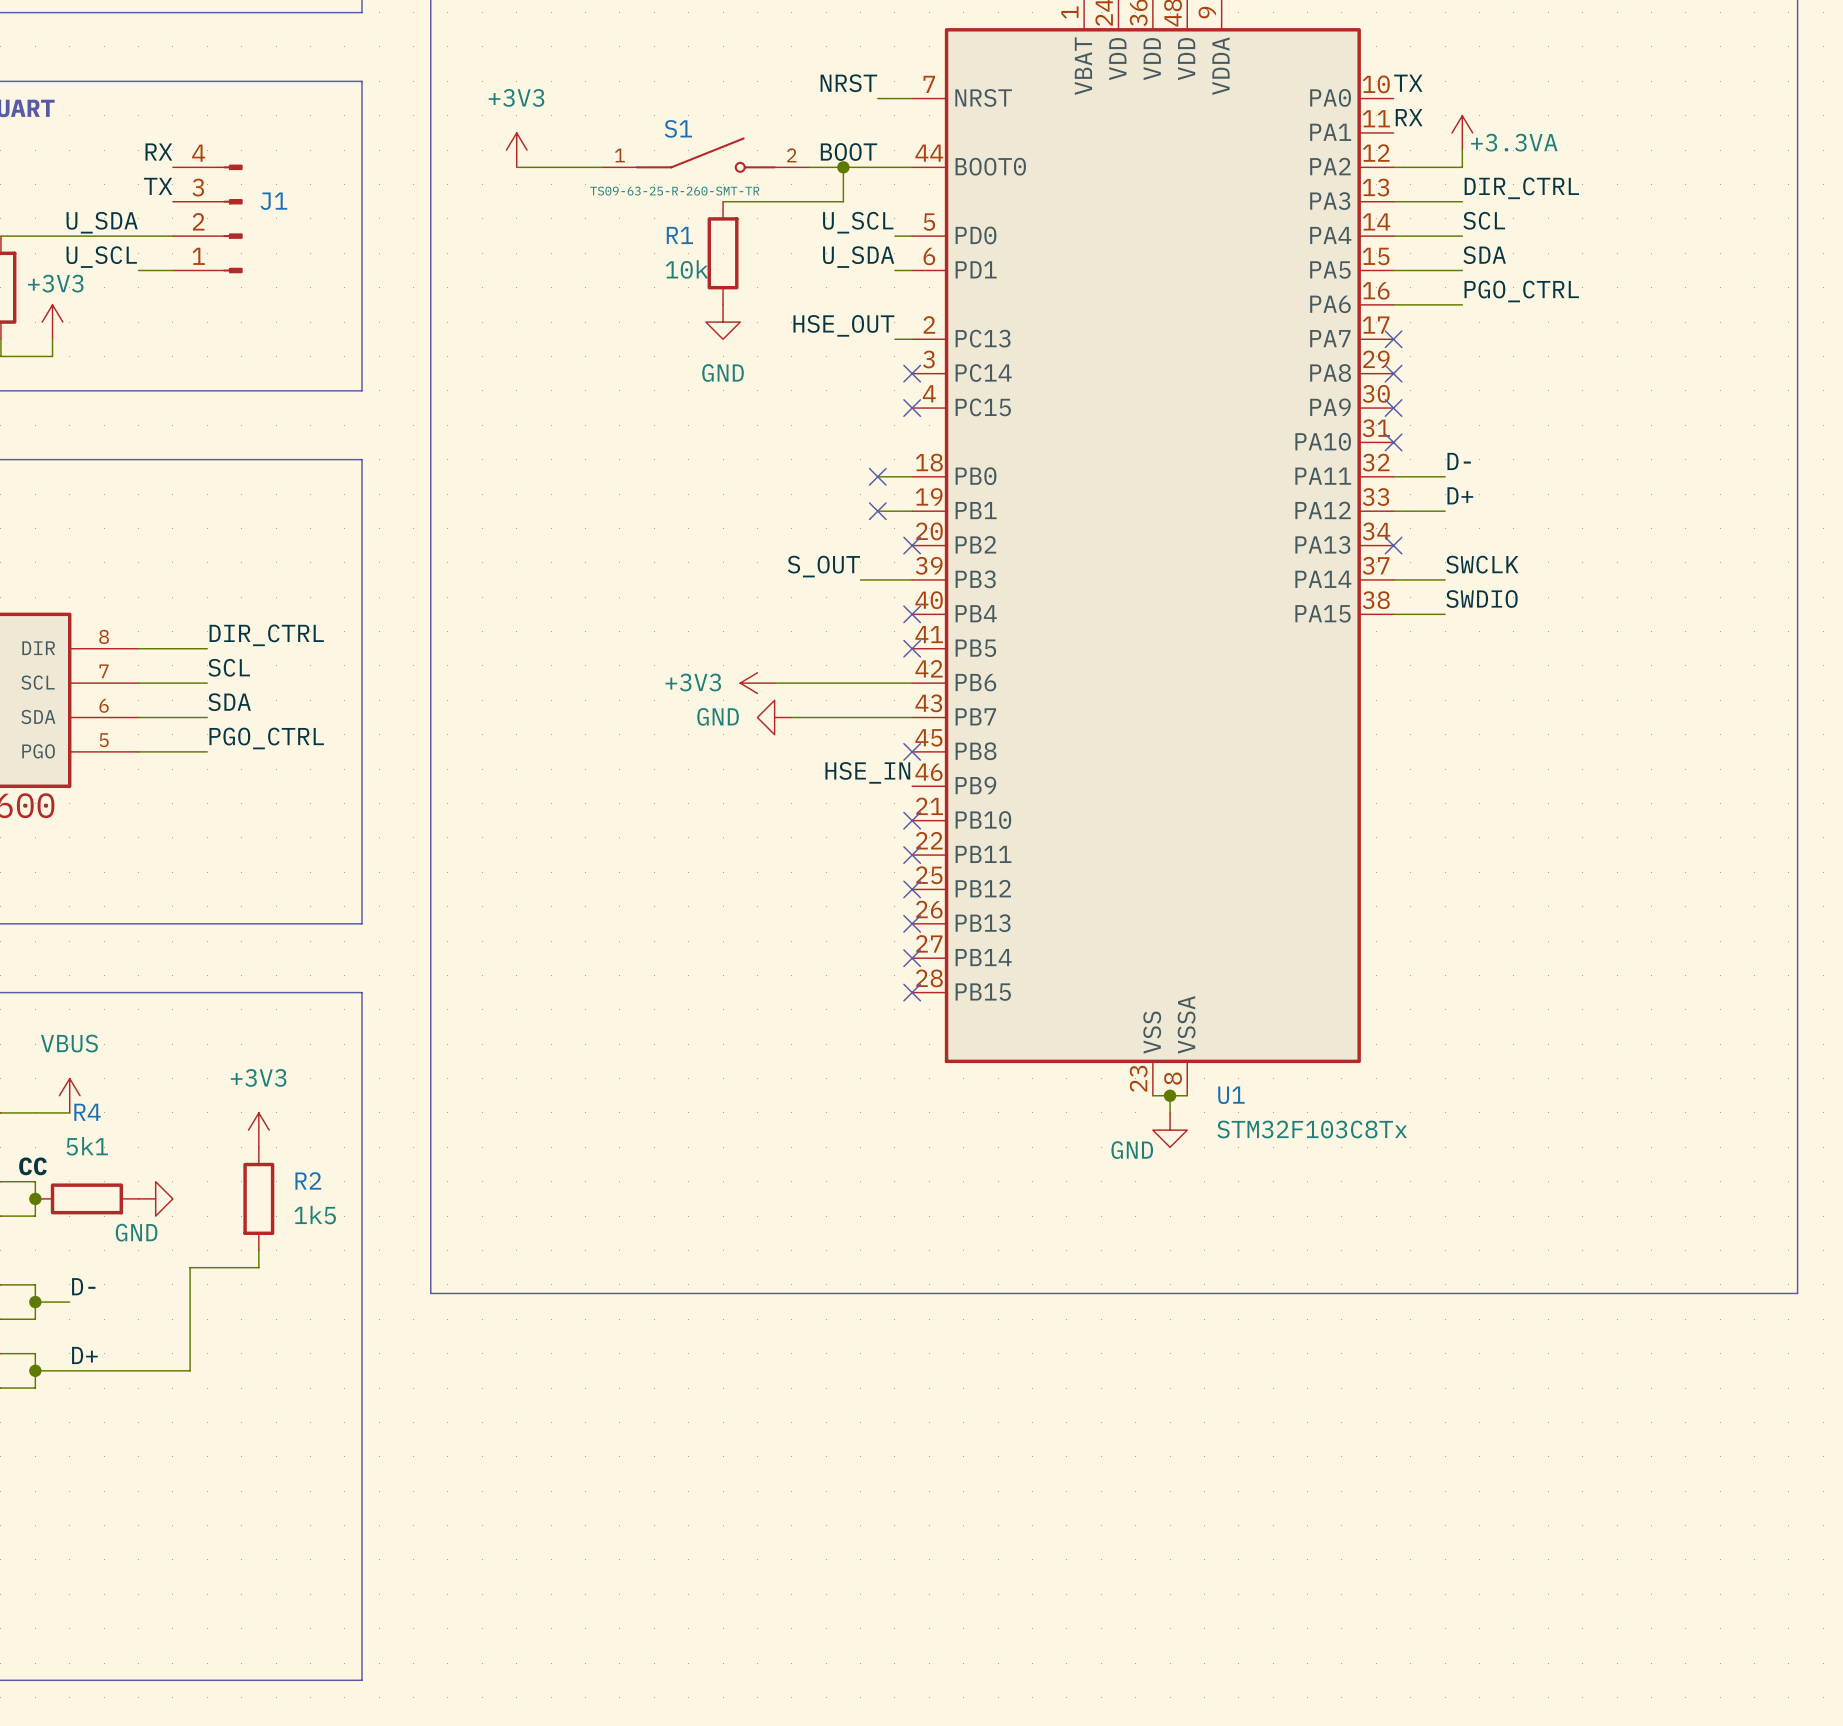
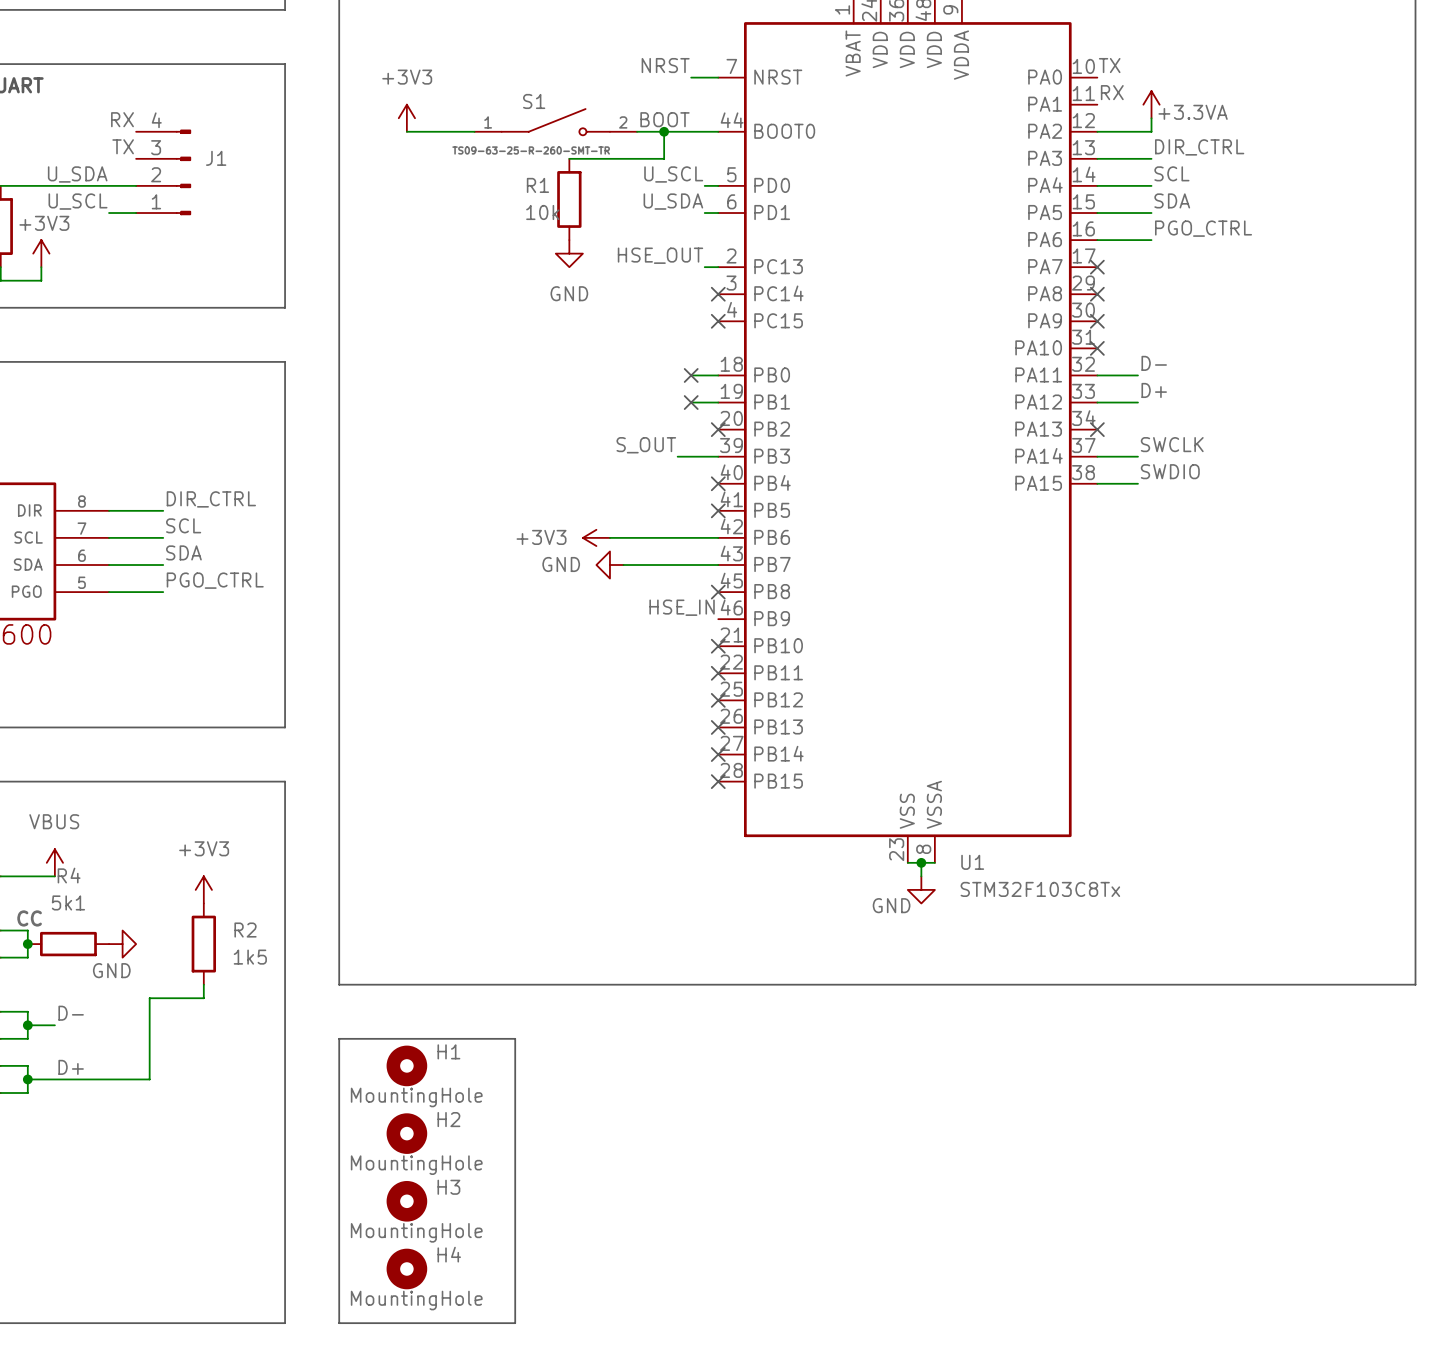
line: (430, 1250) (430, 1293) (1797, 1293) (1797, 1250) -> (339, 984) (1415, 984)
line: none -> (339, 1038) (515, 1038) (515, 1323) (339, 1323) (339, 1038)
H1: none -> MountingHole (406, 1065)
H2: none -> MountingHole (406, 1133)
H3: none -> MountingHole (406, 1201)
H4: none -> MountingHole (406, 1268)

